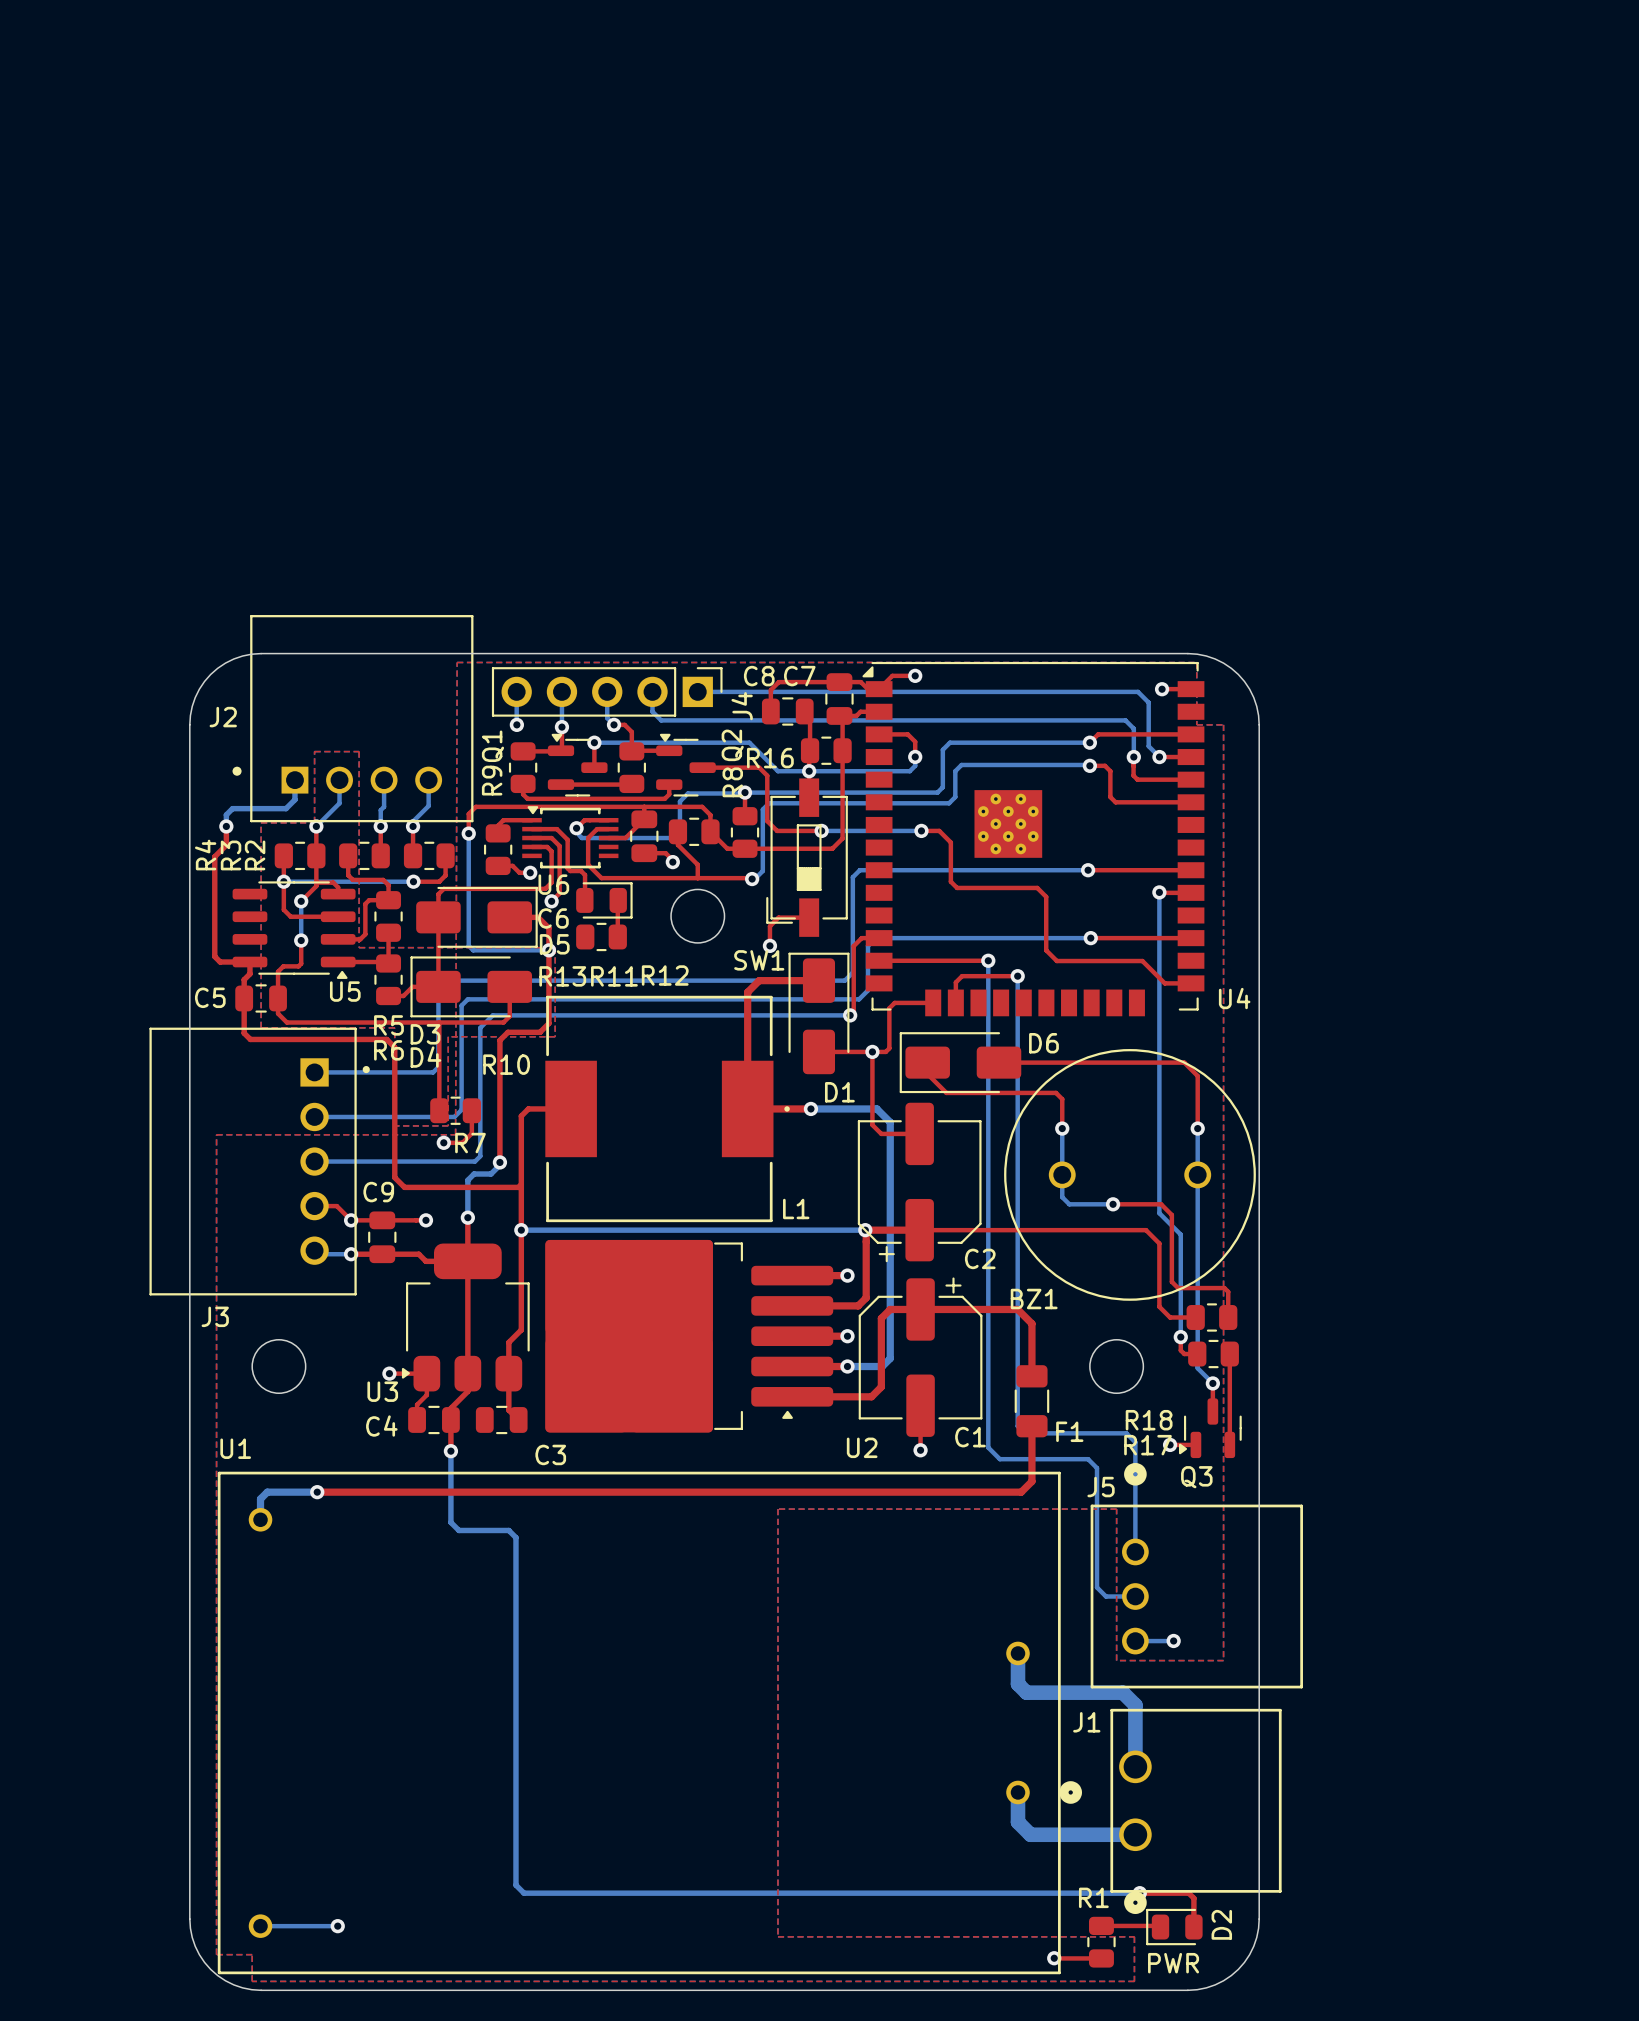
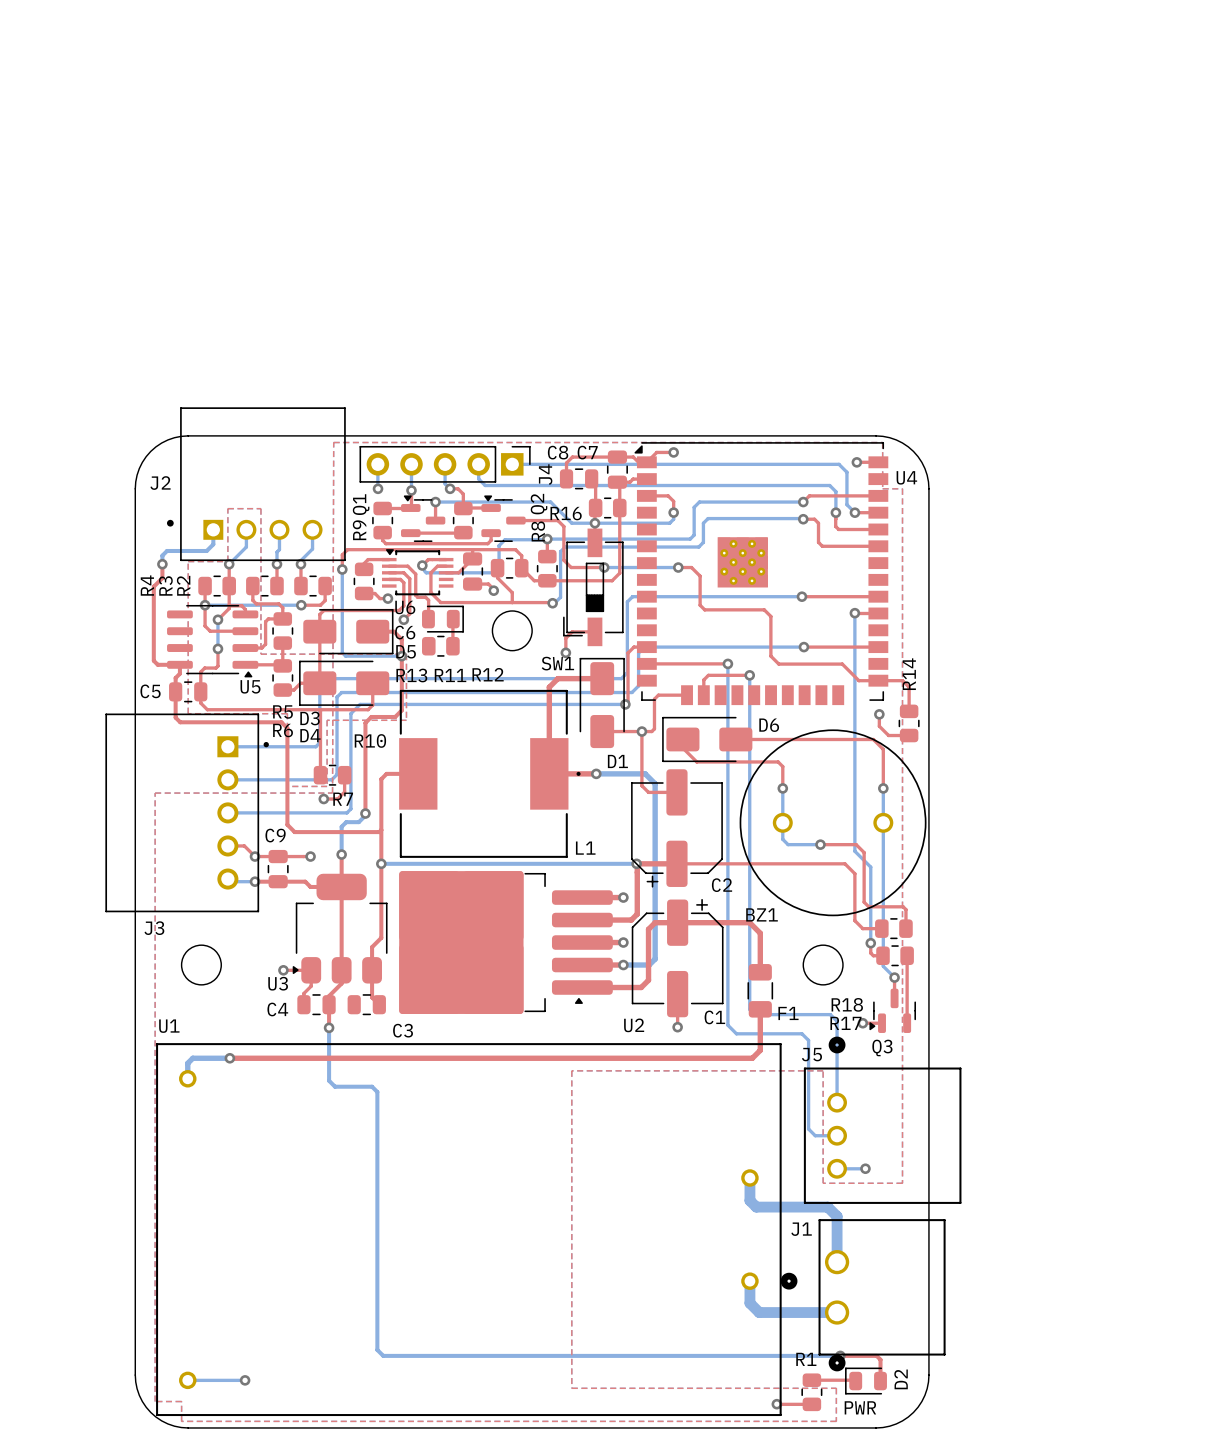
top track: none -> (878, 680) (902, 680) (909, 687) (909, 711)
U4 name position: U4 (1234, 998) -> U4 (906, 477)
top track: none -> (879, 714) (879, 726) (888, 735) (909, 735)
via: none -> (879, 714)
R14: none -> (909, 723)

